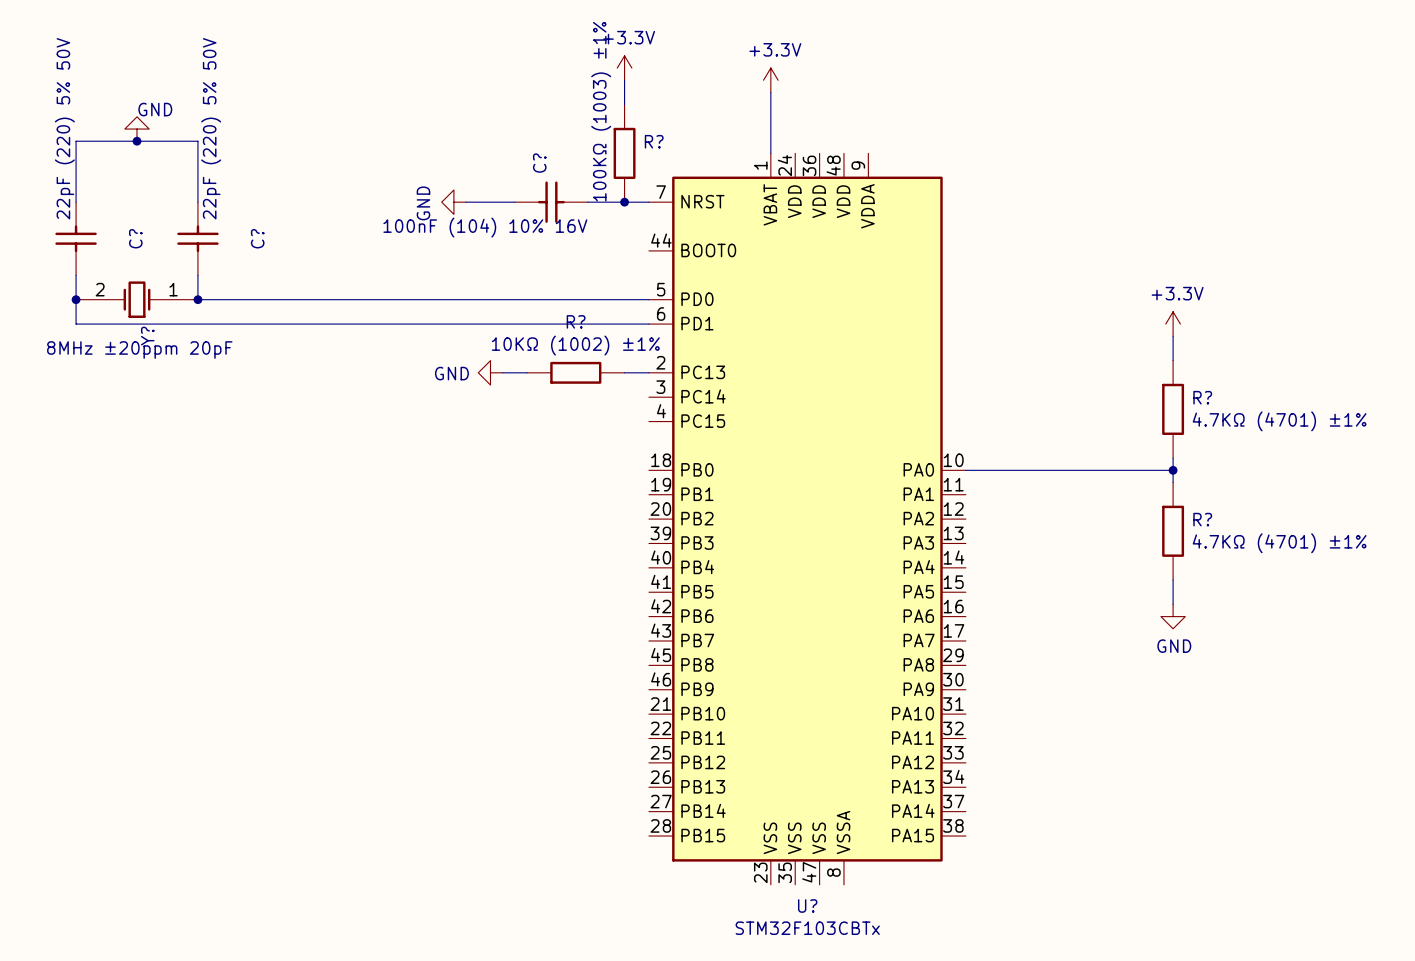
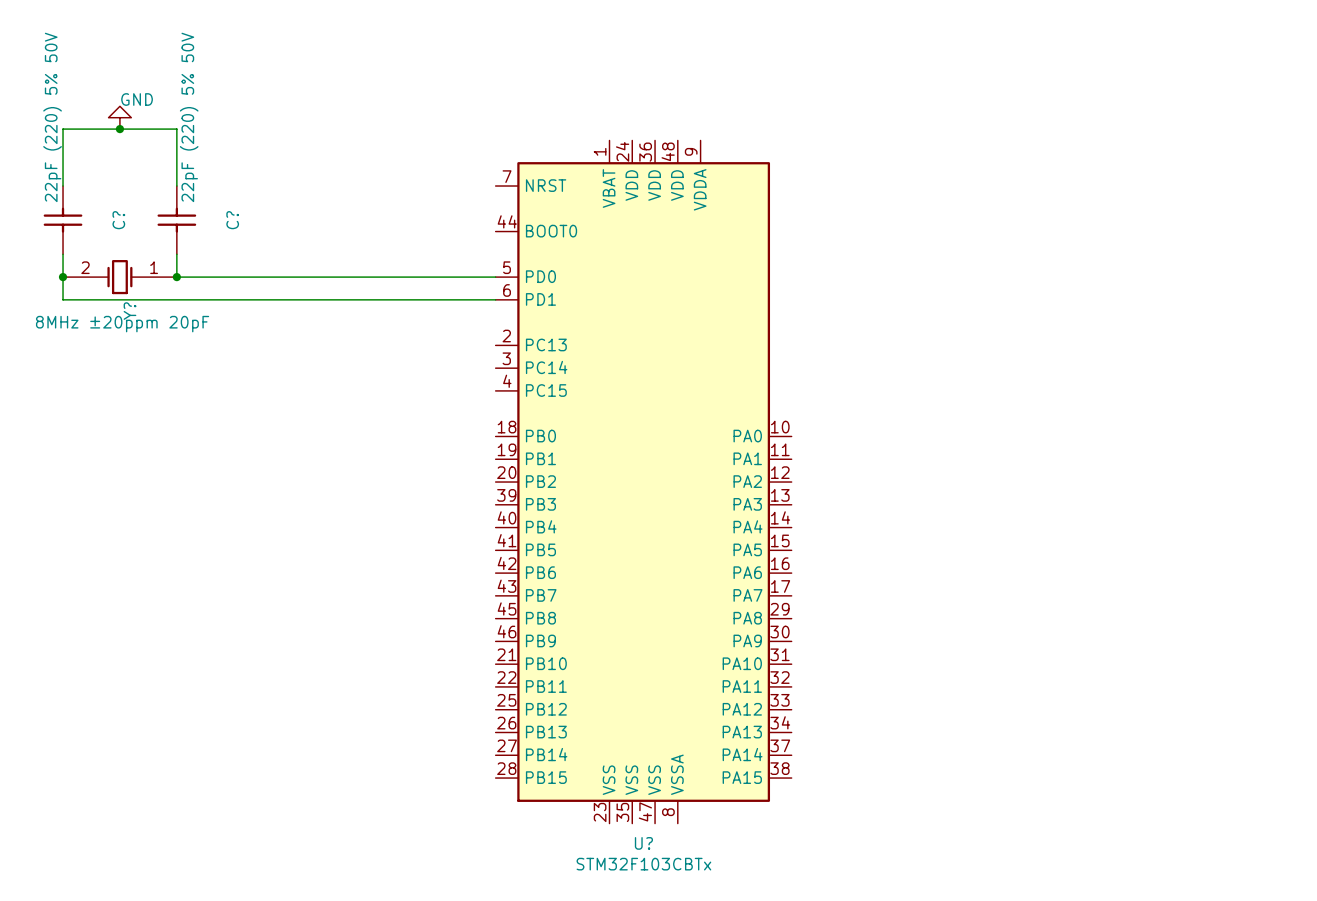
power symbol: +3.3V (624, 68) -> none
wire: (624, 80) (624, 104) -> none
power symbol: +3.3V (770, 80) -> none
wire: (770, 92) (770, 153) -> none
R?: (624, 153) -> none
power symbol: GND (453, 202) -> none
wire: (466, 202) (514, 202) -> none
C?: (551, 202) -> none
junction: (624, 202) -> none
power symbol: +3.3V (1173, 324) -> none
wire: (1173, 336) (1173, 360) -> none
power symbol: GND (490, 372) -> none
wire: (502, 372) (527, 372) -> none
R?: (575, 372) -> none
R?: (1173, 409) -> none
wire: (1173, 458) (1173, 482) -> none
wire: (965, 470) (1173, 470) -> none
junction: (1173, 470) -> none
U? position: (807, 519) -> (643, 482)
R?: (1173, 531) -> none
wire: (1173, 580) (1173, 604) -> none
power symbol: GND (1173, 616) -> none

